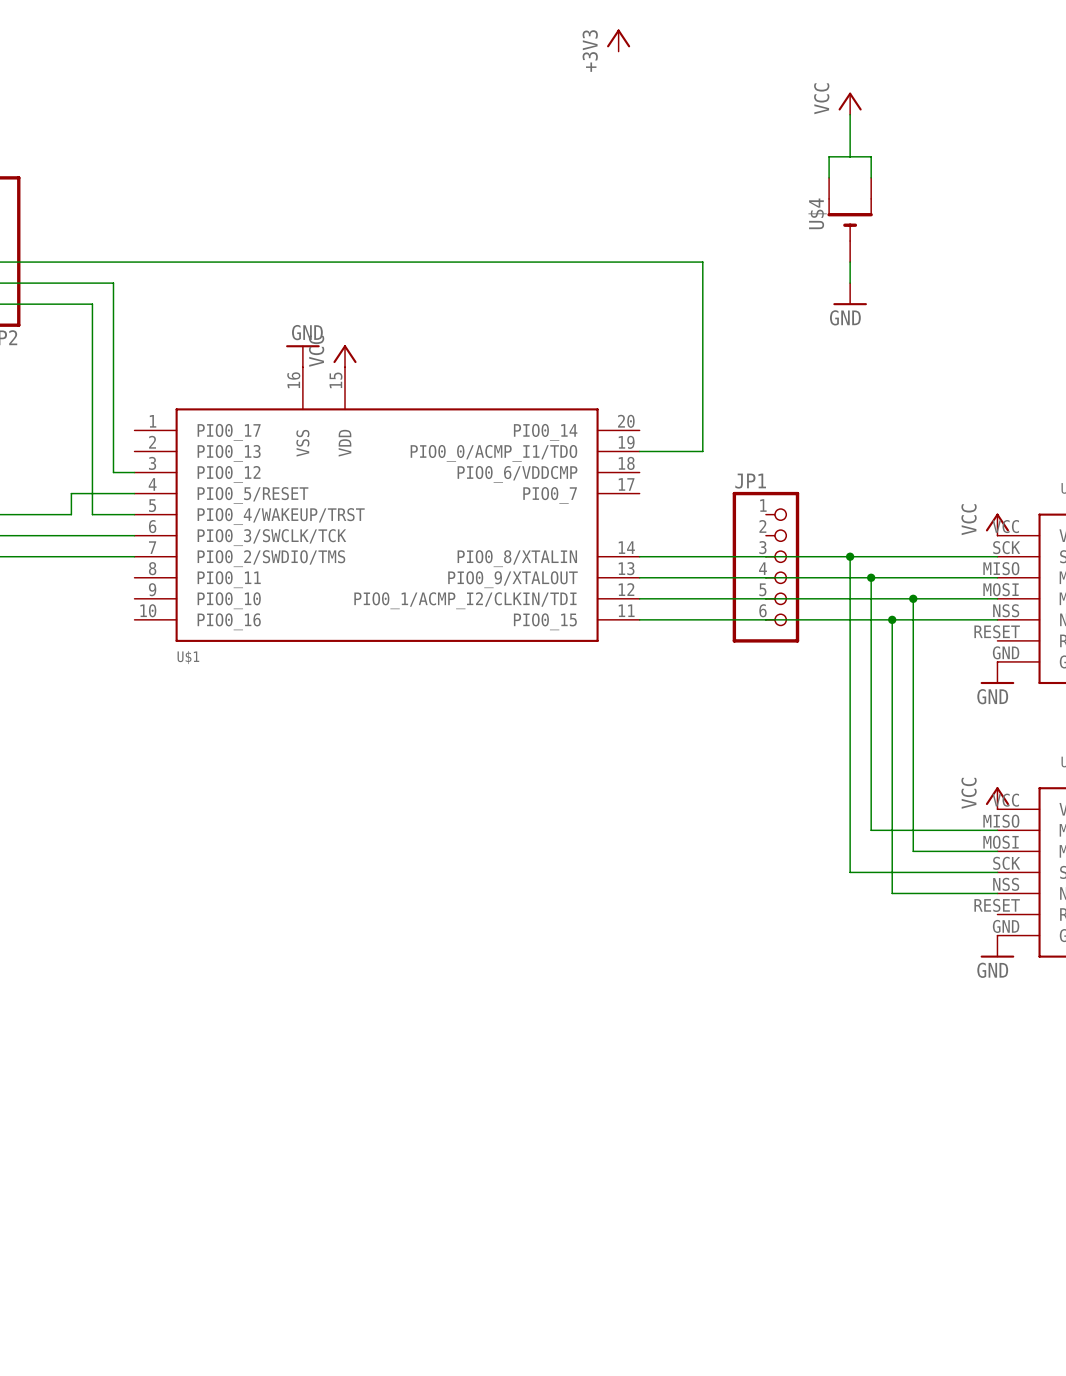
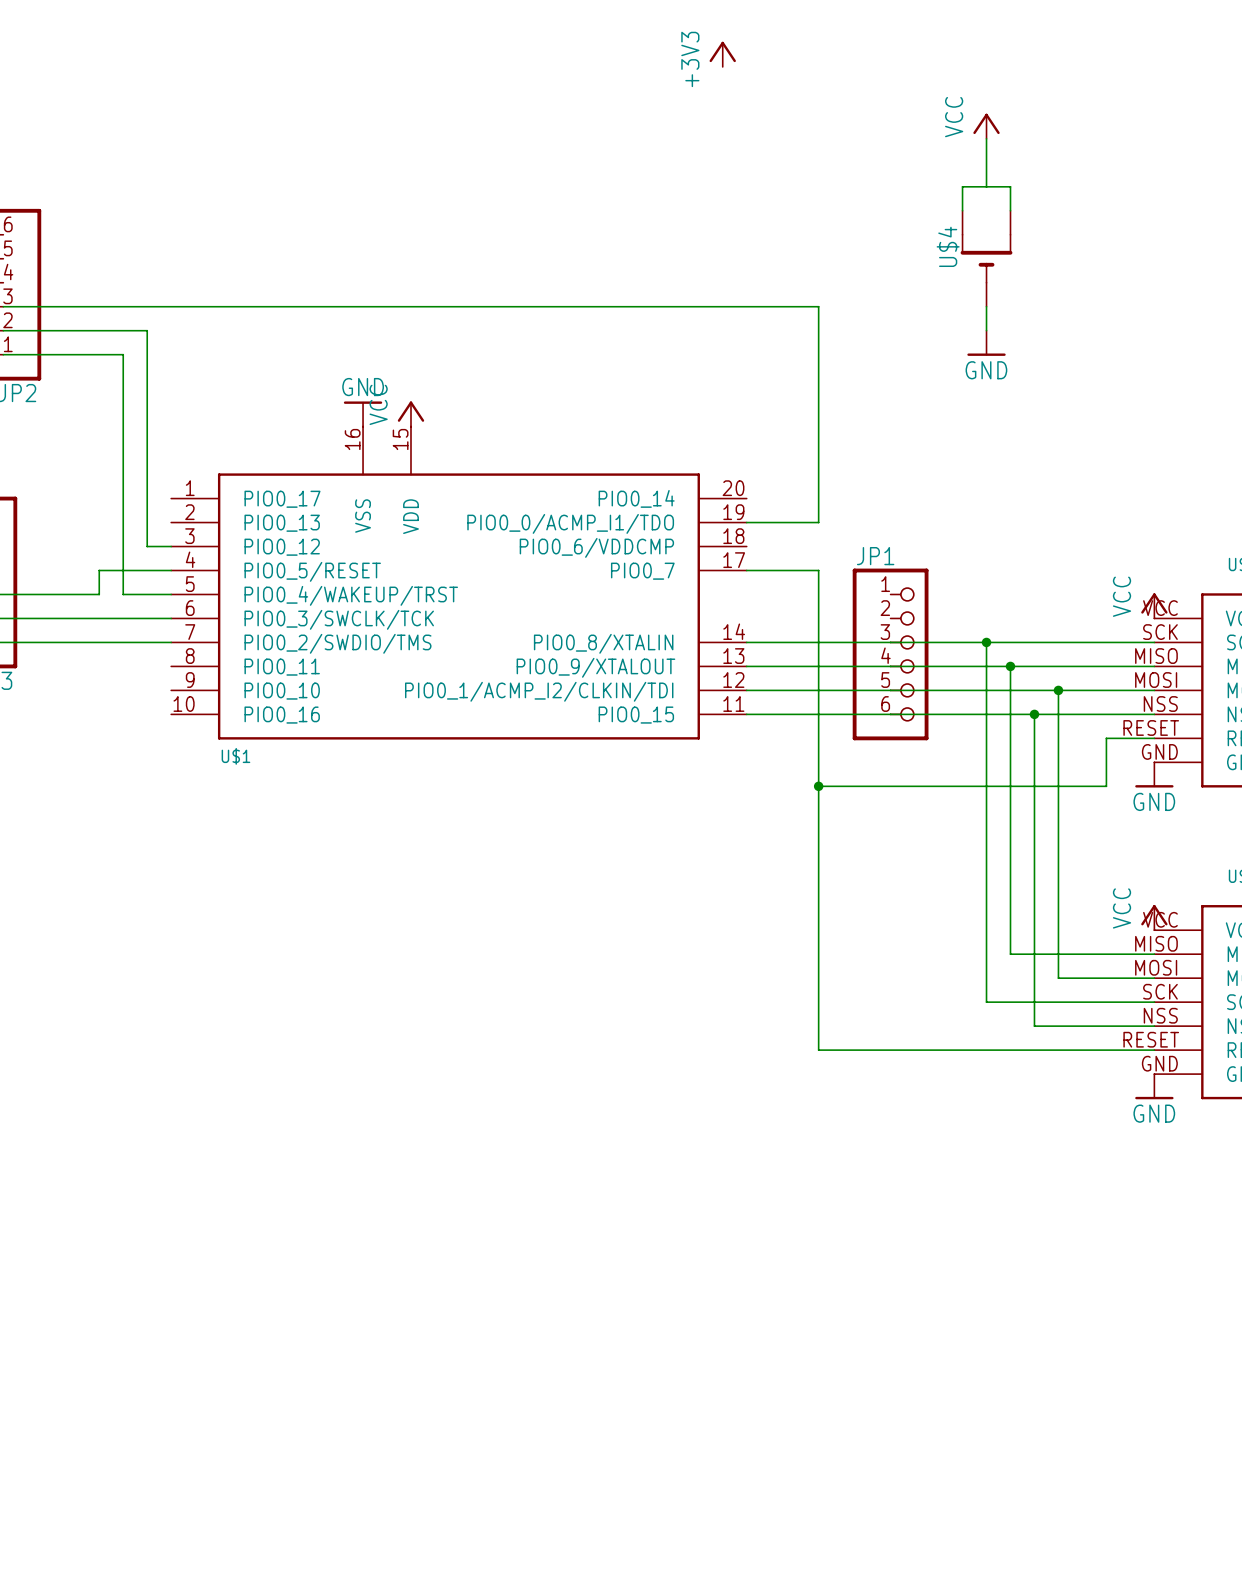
wire: none -> (746, 570) (818, 570) (818, 1050) (1154, 1050)
wire: none -> (1154, 738) (1106, 738) (1106, 786) (818, 786)
junction: none -> (818, 786)

